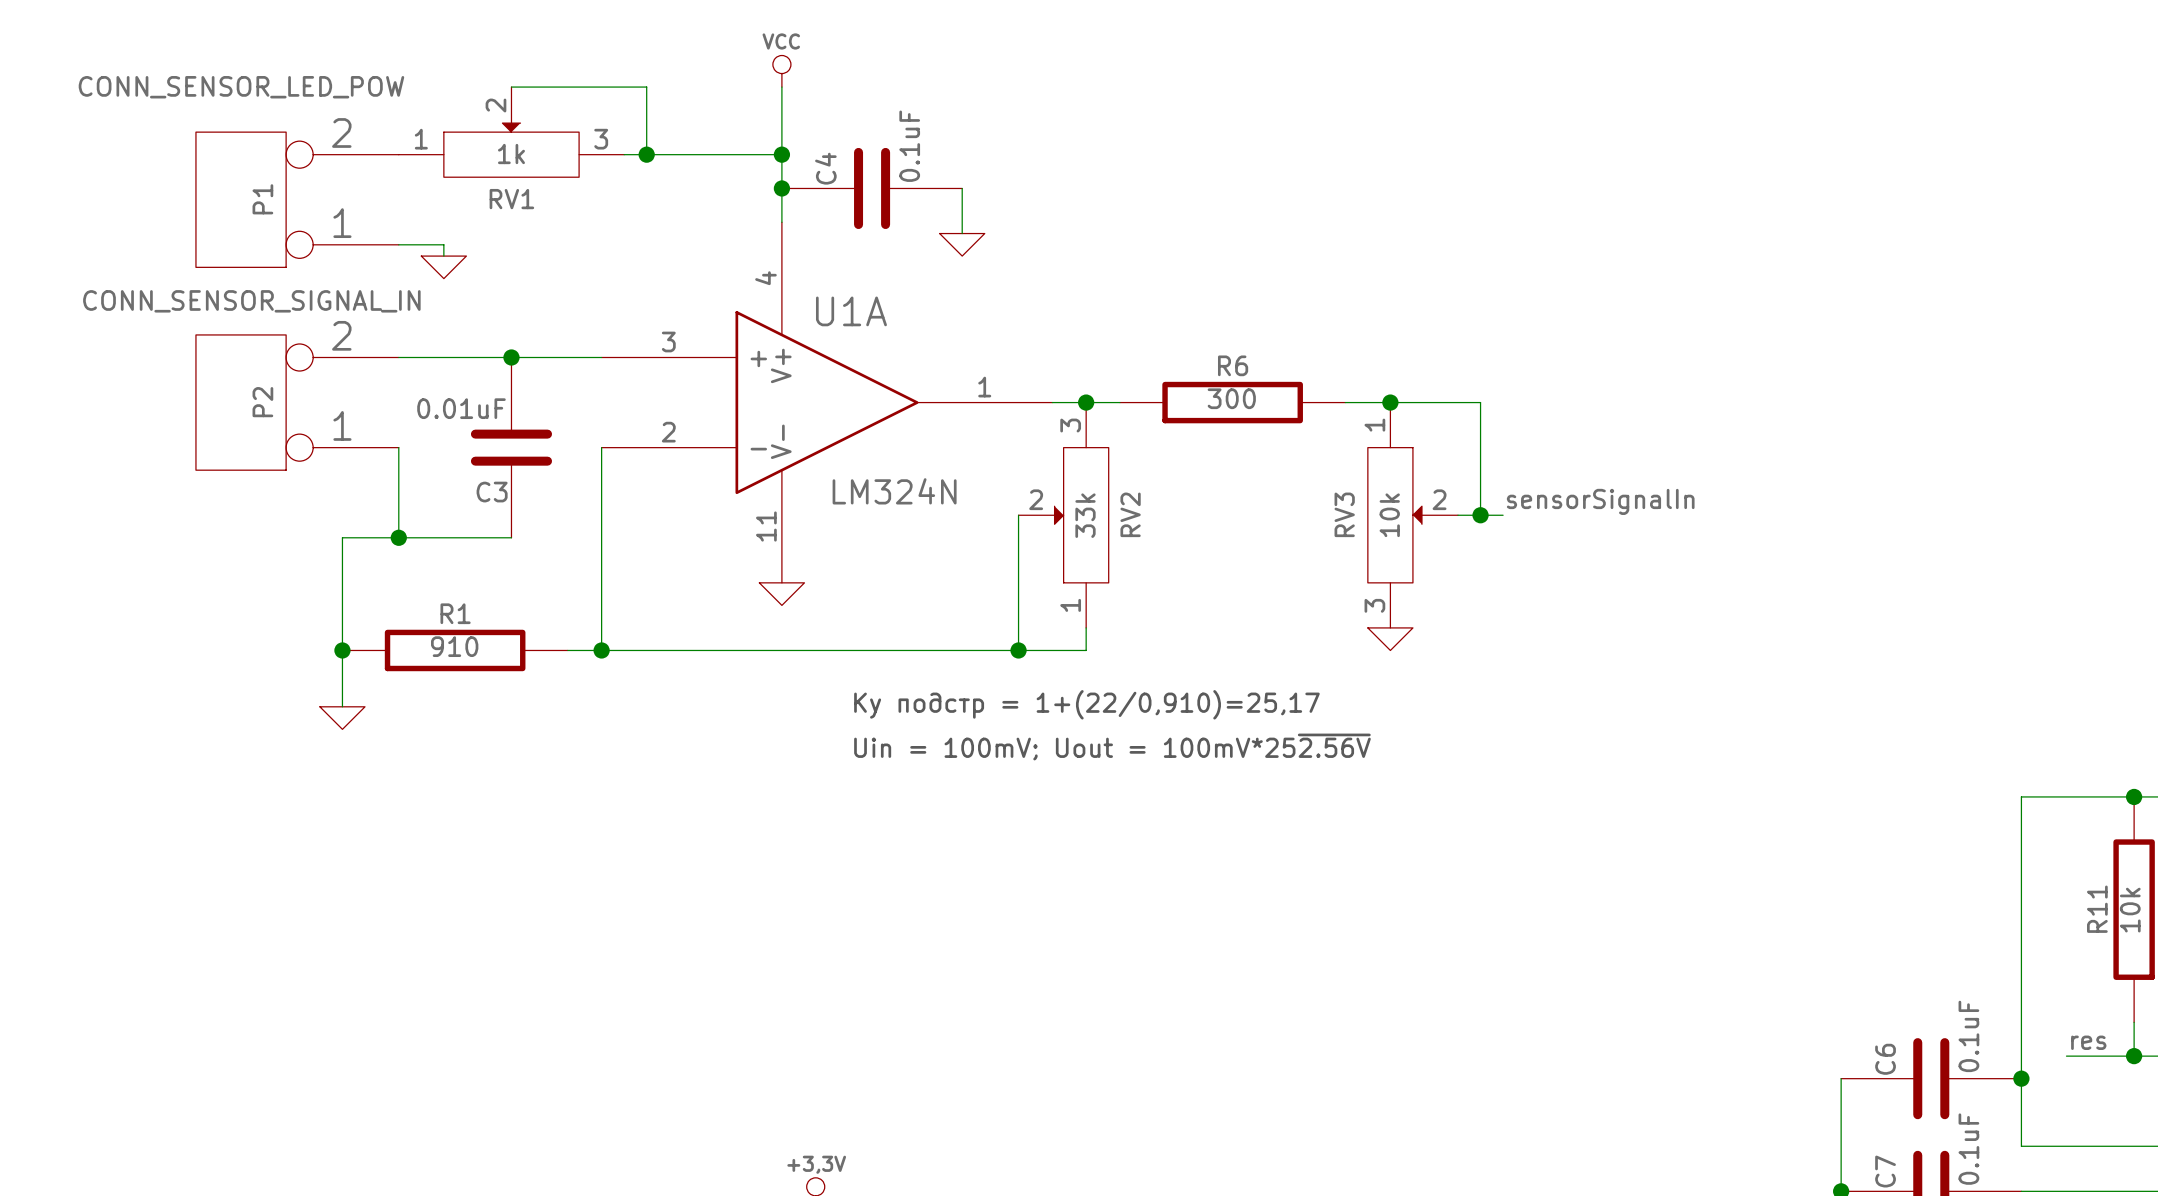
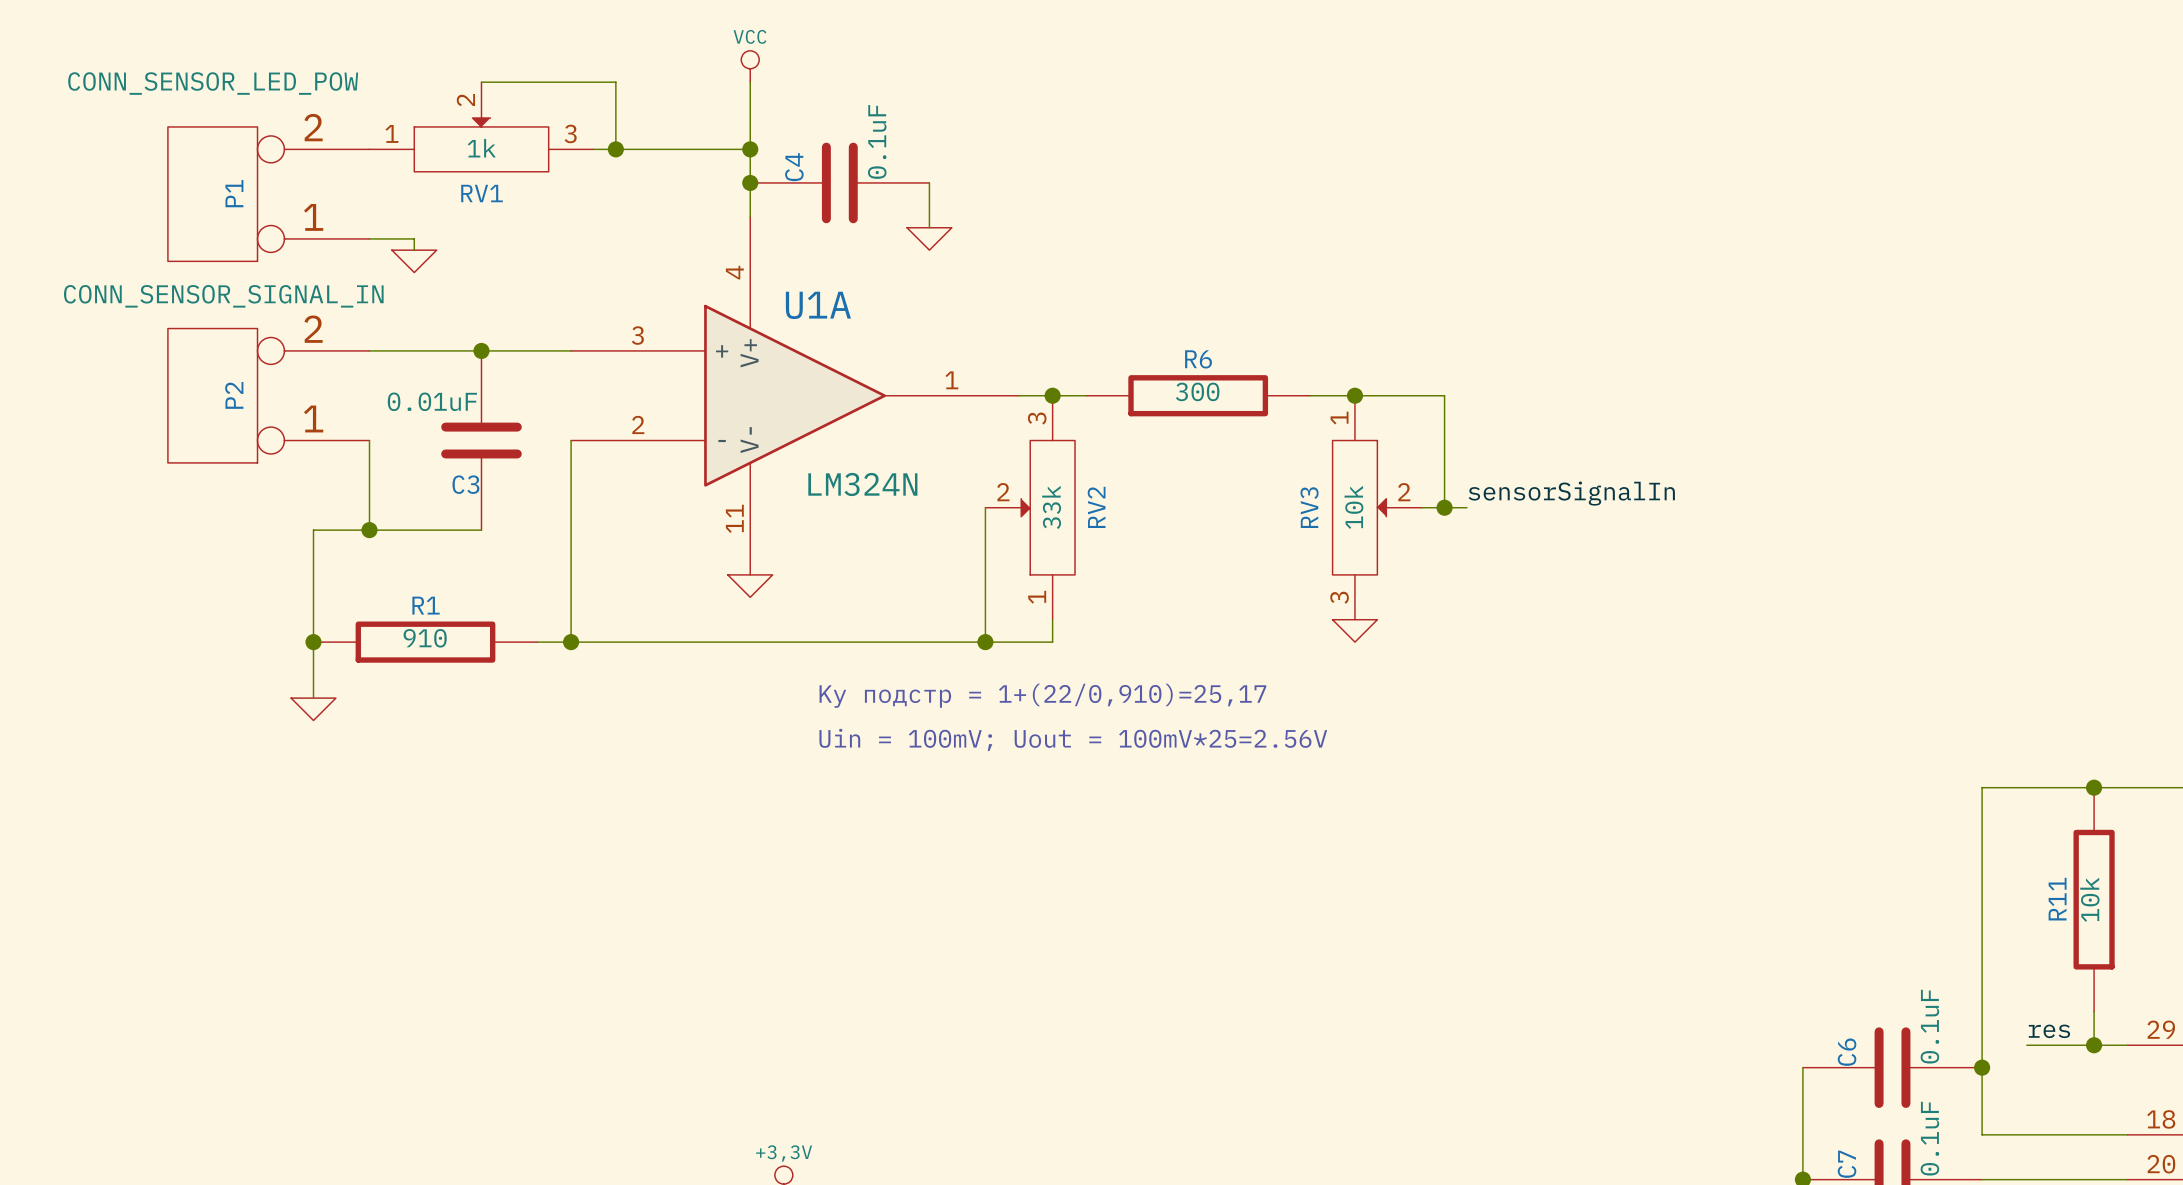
text: Uin = 100mV; Uout = 100mV*25~{2.56V} (1112, 747) -> Uin = 100mV; Uout = 100mV*25=2.56V (1073, 739)

